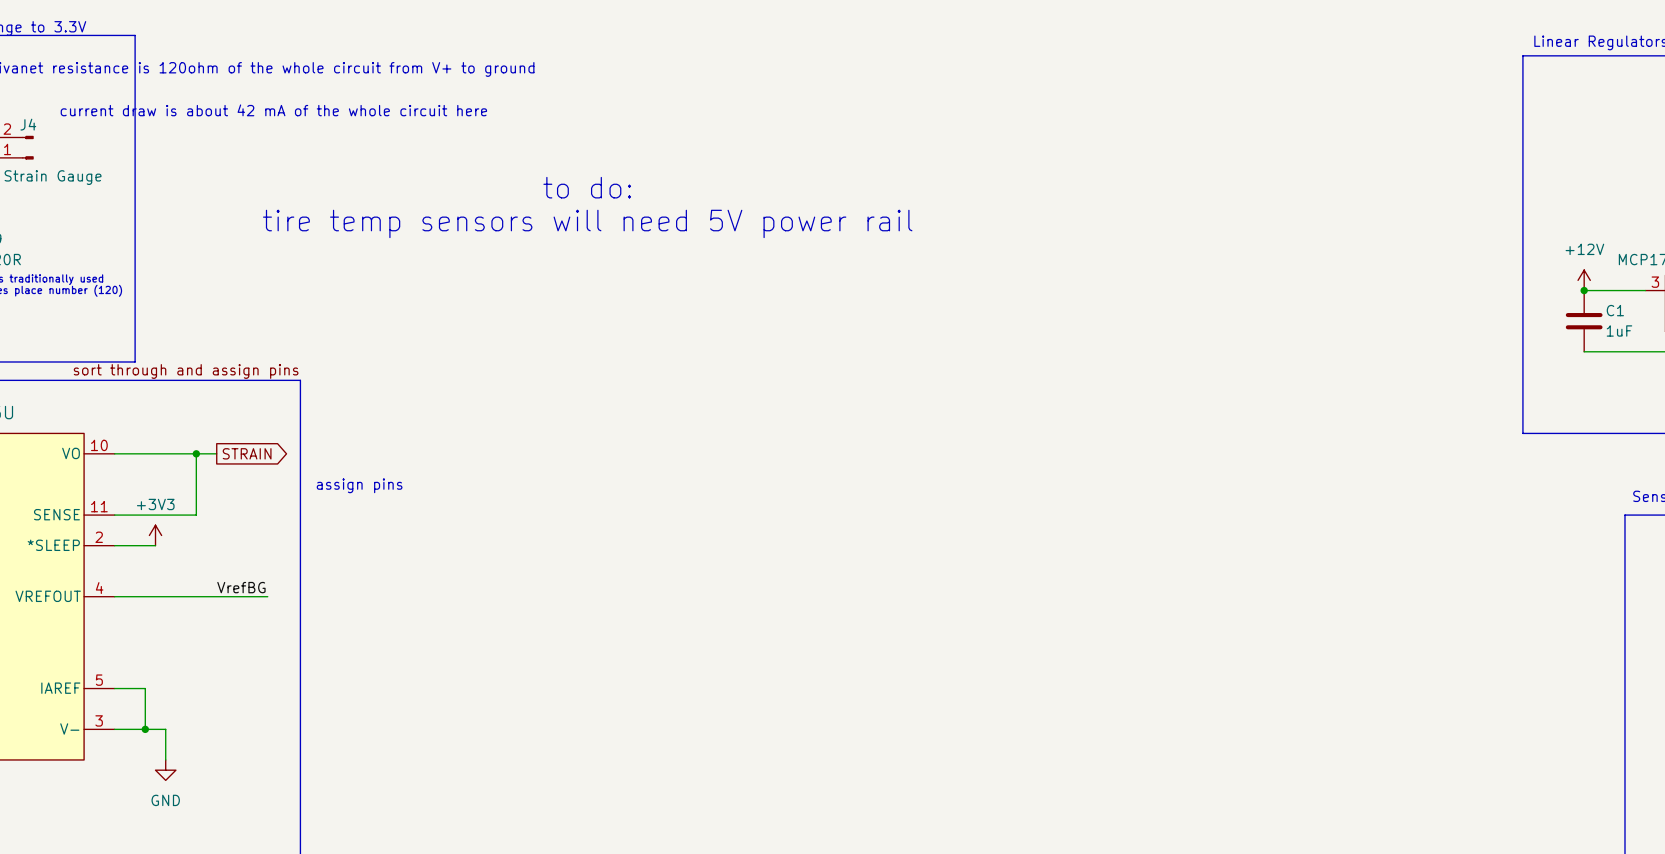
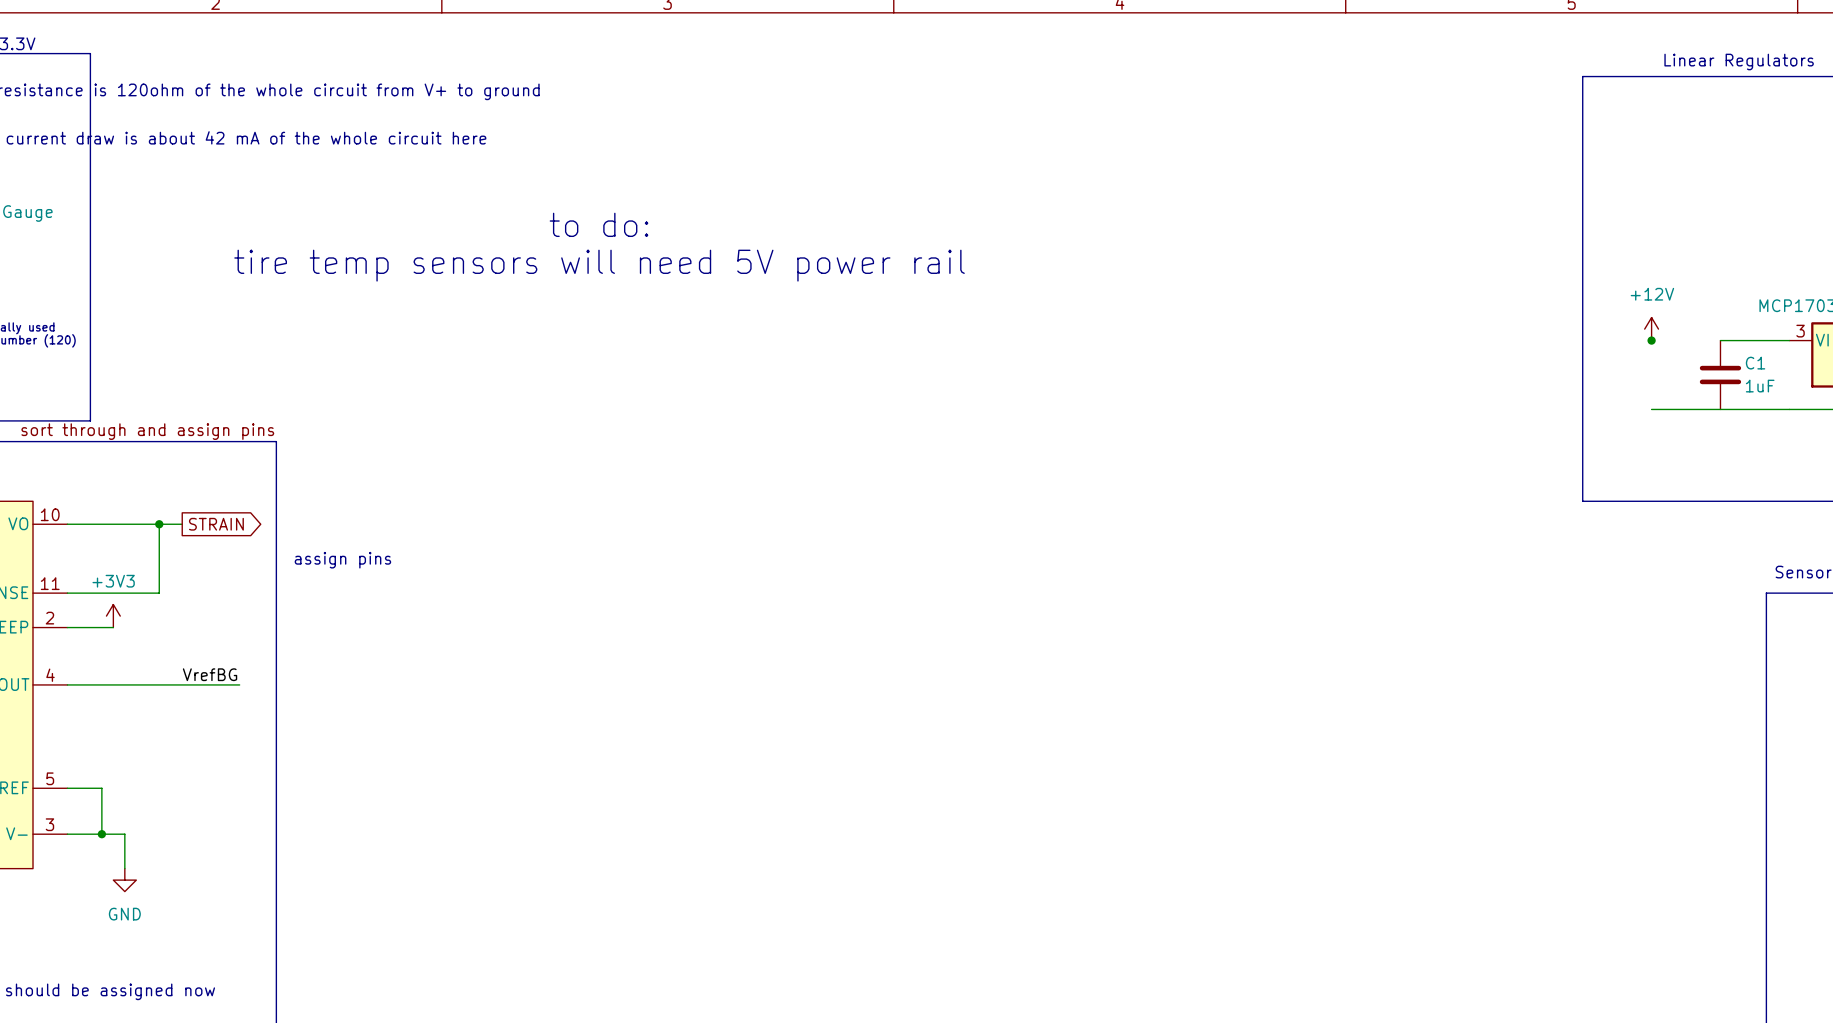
line: (1522, 55) (1522, 433) -> (1651, 76) (1582, 76) (1582, 501) (1651, 501)
power symbol position: +12V (1584, 280) -> +12V (1651, 329)
junction: none -> (1651, 340)
junction: (1584, 290) -> none
wire: none -> (1651, 409) (1720, 409)

